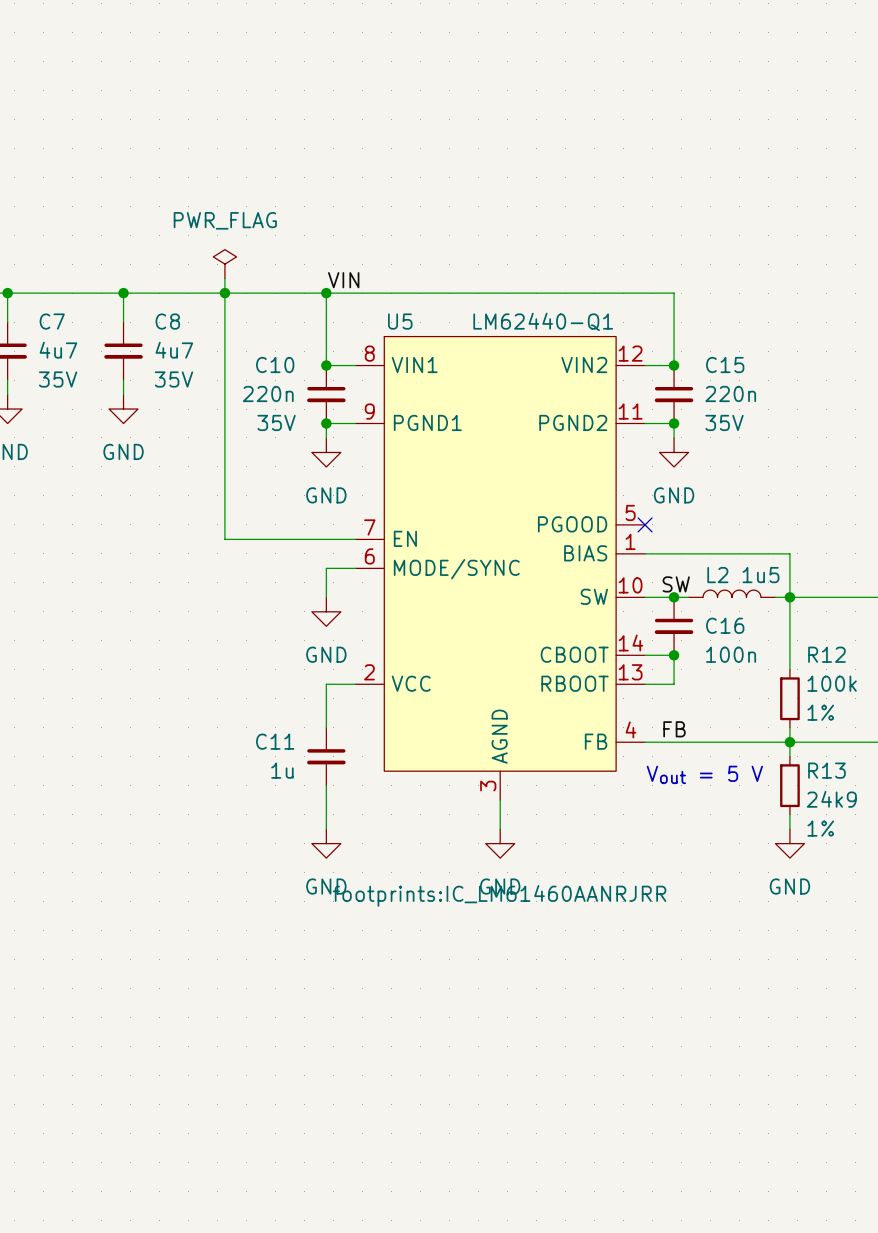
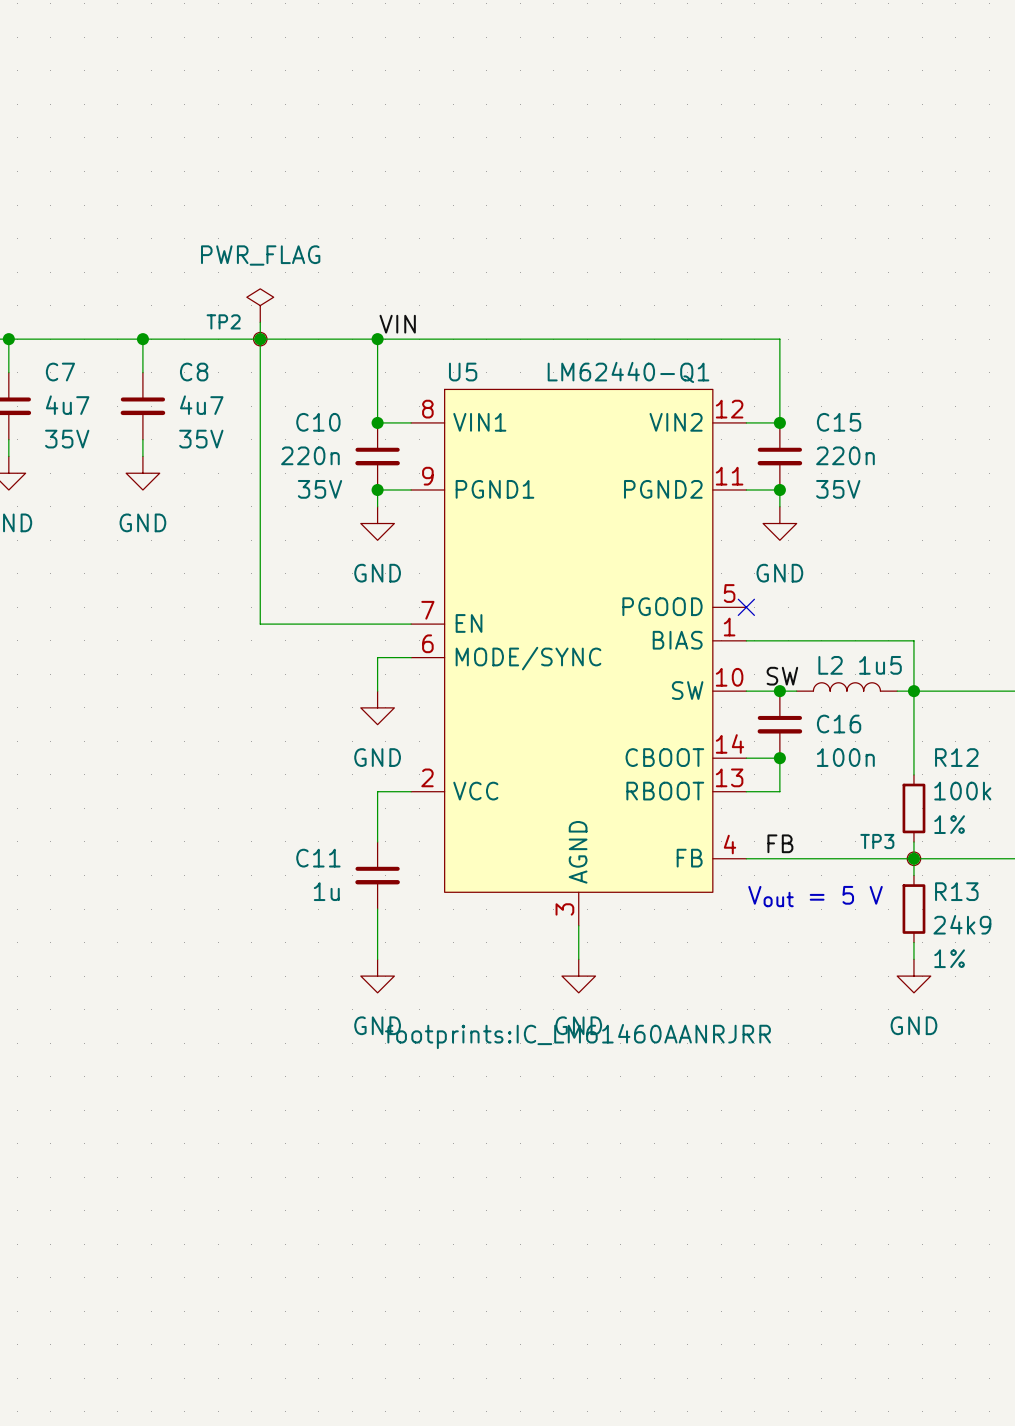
TP2: none -> (260, 339)
TP3: none -> (913, 858)

